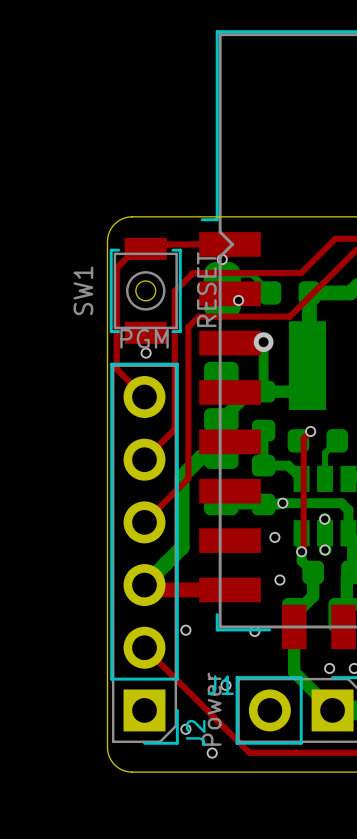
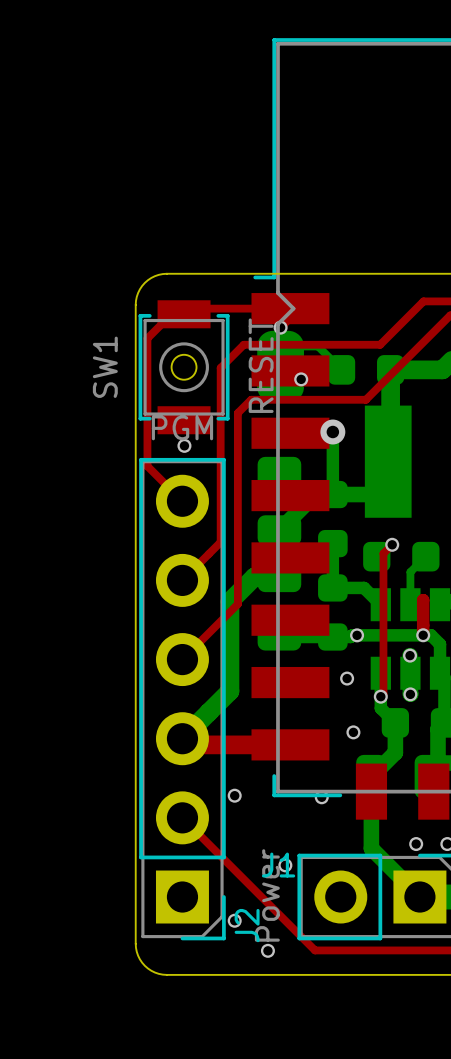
top track: none -> (423, 600) (423, 635)
via: none -> (423, 635)

